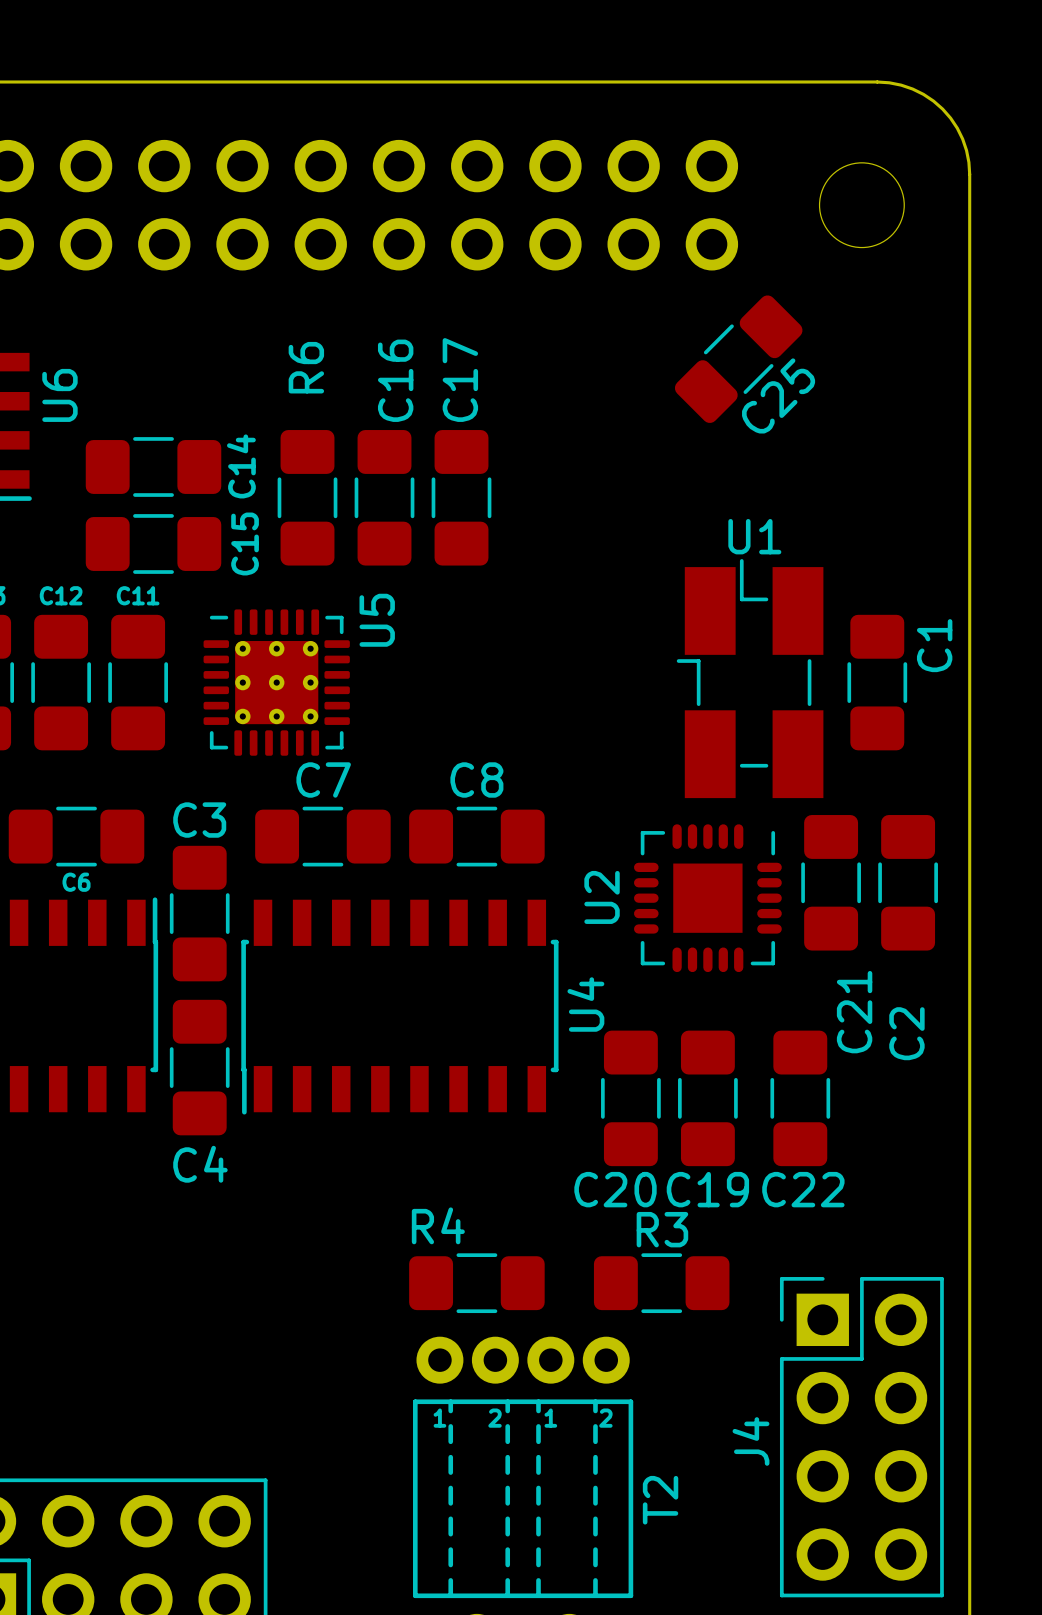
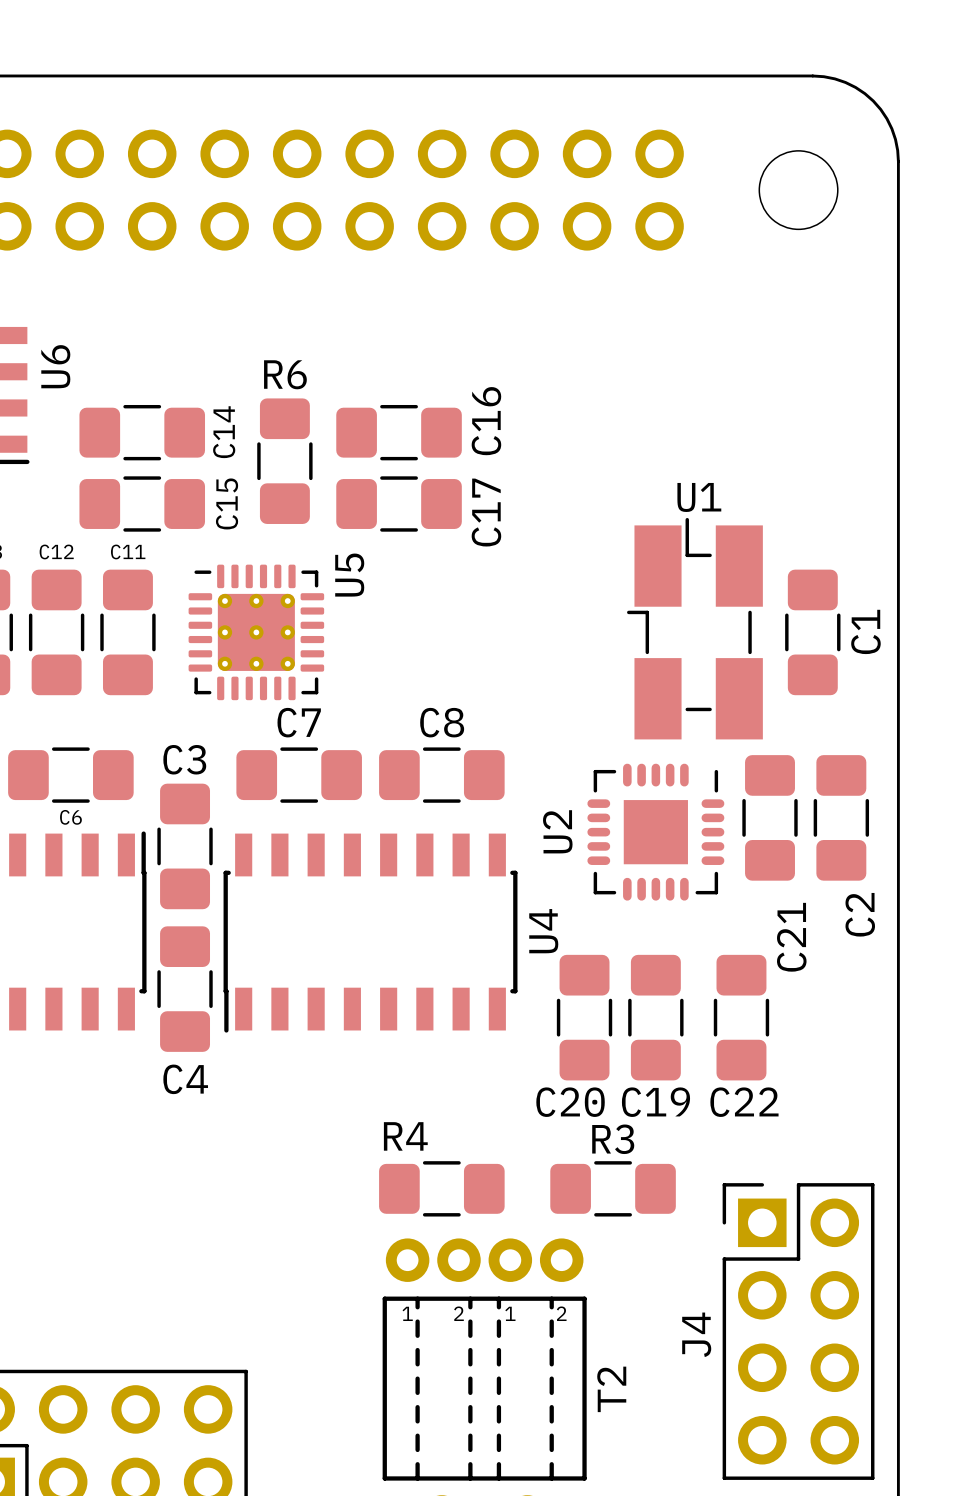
C25: (738, 359) -> none
R6 name rotation: 0° (306, 367) -> 90° clockwise (285, 374)
C16 rotation: 0° (384, 497) -> 90° clockwise (399, 432)
C17 rotation: 0° (461, 497) -> 90° clockwise (399, 504)
C1 name position: C1 (934, 645) -> C1 (865, 631)
C2 name position: C2 (906, 1033) -> C2 (860, 914)

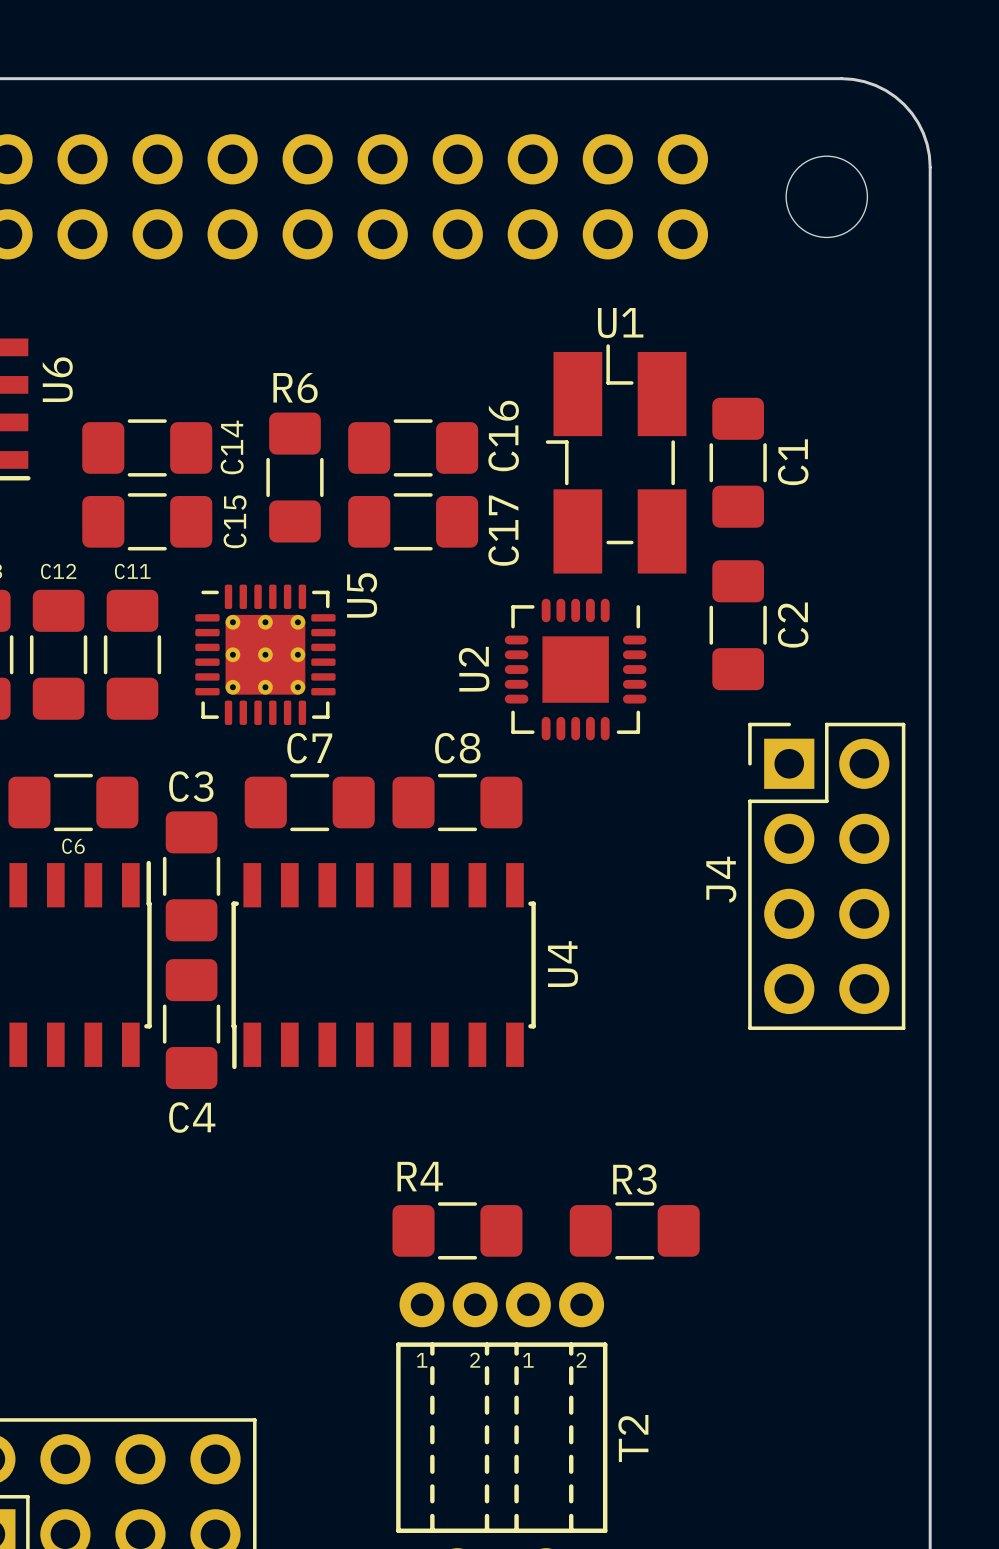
U1 position: (694, 628) -> (616, 458)
C1 position: (812, 632) -> (738, 462)
C21: (770, 817) -> none
C2 position: (841, 817) -> (738, 625)
U2 position: (655, 832) -> (575, 669)
C2 name position: C2 (860, 914) -> C2 (793, 625)
C20: (584, 1017) -> none
C19: (655, 1017) -> none
C22: (741, 1017) -> none
J4 position: (798, 1331) -> (826, 876)

